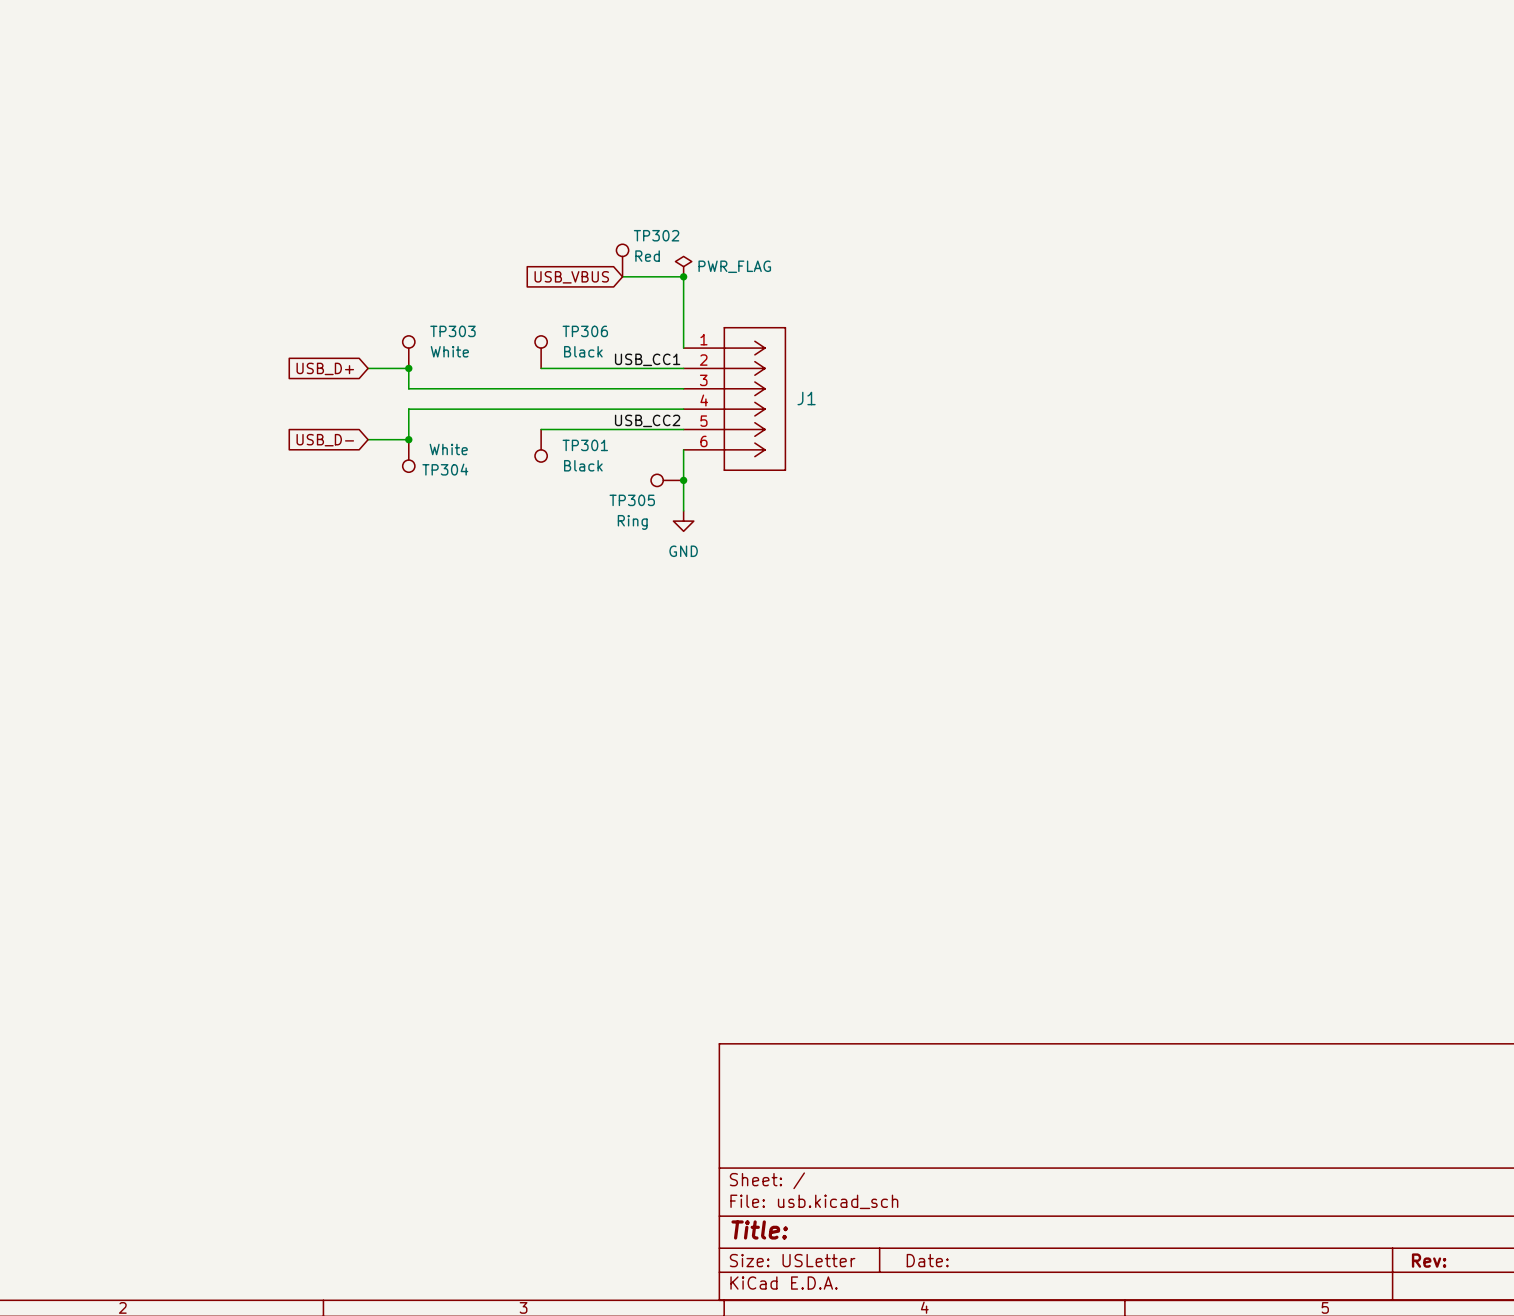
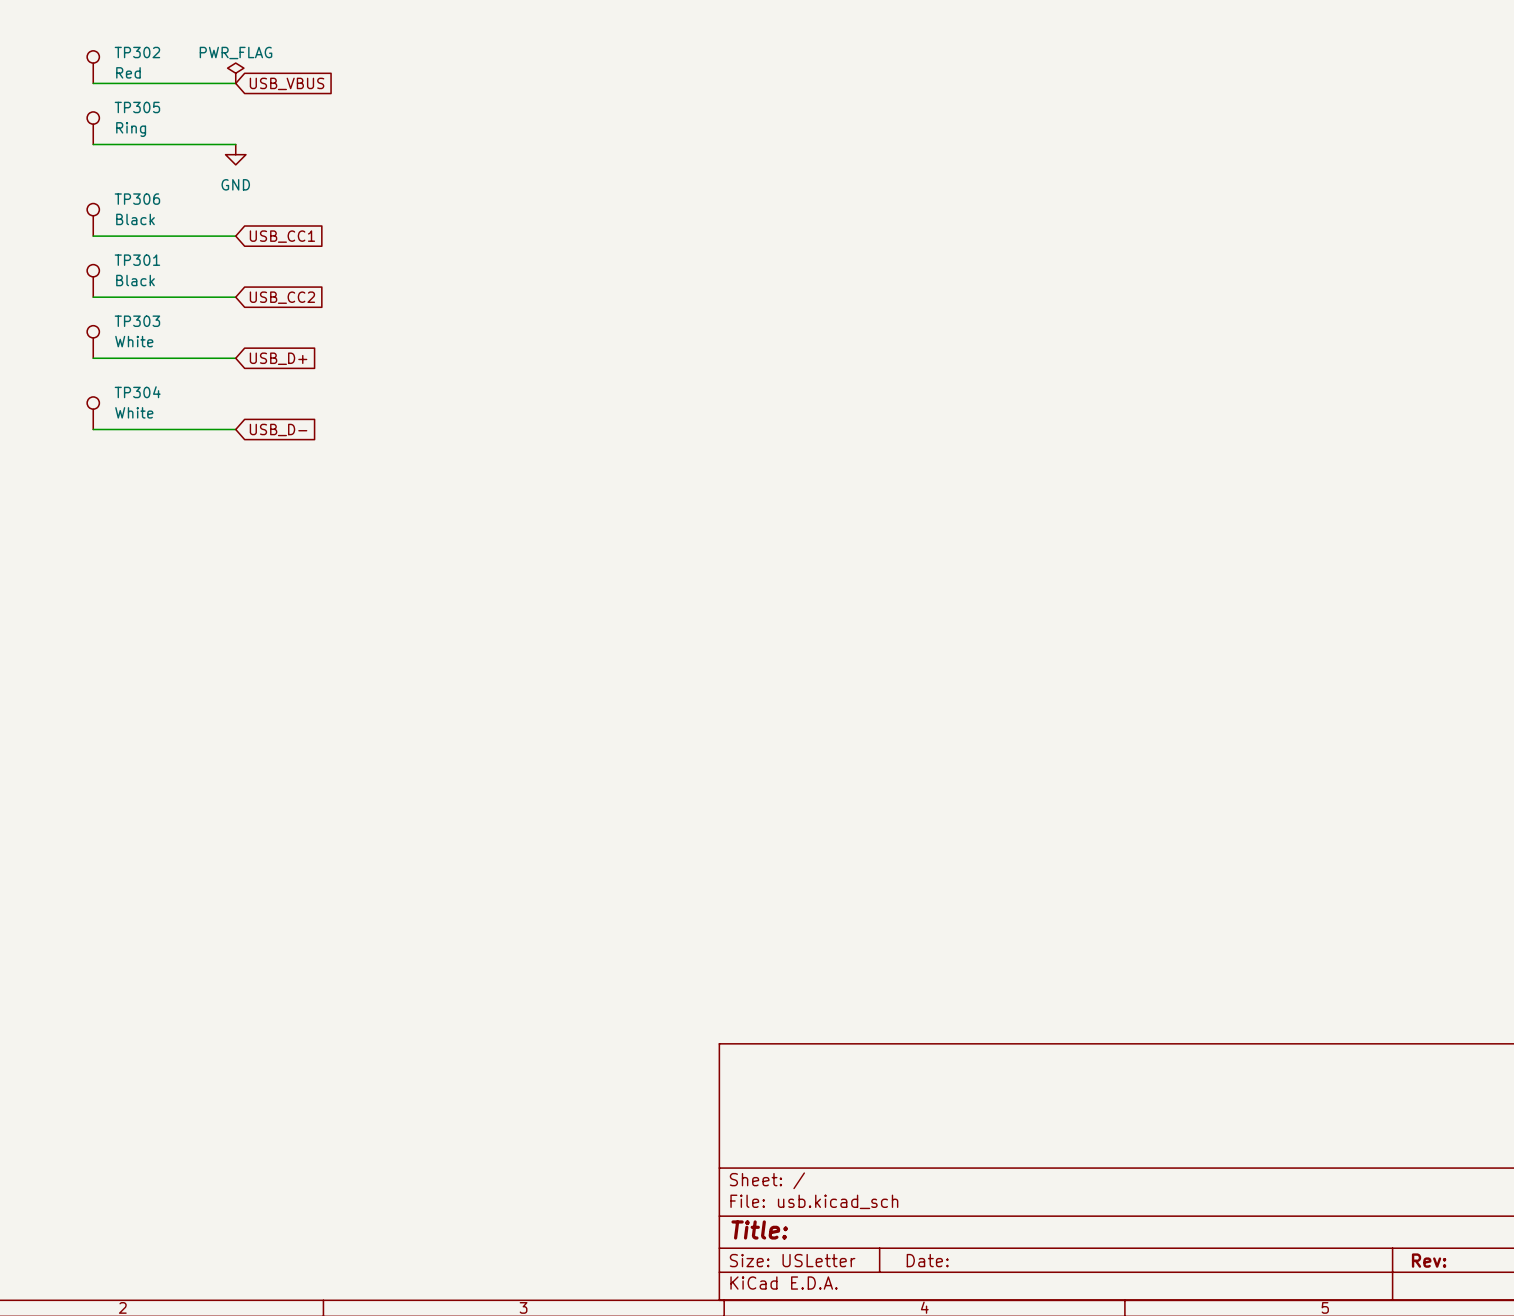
power symbol: none -> PWR_FLAG (235, 73)
wire: none -> (93, 83) (235, 83)
global label: none -> USB_VBUS (287, 83)
wire: none -> (93, 144) (235, 144)
power symbol: none -> GND (235, 154)
TP302 name position: TP302 (656, 235) -> TP302 (137, 52)
wire: none -> (93, 236) (235, 236)
global label: none -> USB_CC1 (282, 236)
TP302 value position: Red (647, 256) -> Red (128, 72)
TP302 position: (622, 260) -> (93, 67)
power symbol: PWR_FLAG (683, 266) -> none
wire: (622, 276) (683, 276) (683, 348) -> none
junction: (683, 276) -> none
global label: USB_VBUS (571, 277) -> none
wire: none -> (93, 297) (235, 297)
global label: none -> USB_CC2 (282, 297)
TP303 position: (408, 352) -> (93, 341)
TP306 position: (541, 352) -> (93, 219)
wire: none -> (93, 358) (235, 358)
label: USB_CC1 (647, 359) -> none
global label rotation: 0° (325, 368) -> 180° (278, 358)
wire: (368, 368) (408, 368) (408, 388) (683, 388) -> none
junction: (408, 368) -> none
wire: (541, 368) (683, 368) -> none
J1: (734, 398) -> none
wire: (683, 409) (408, 409) (408, 439) (368, 439) -> none
label: USB_CC2 (647, 420) -> none
wire: none -> (93, 429) (235, 429)
wire: (541, 429) (683, 429) -> none
junction: (408, 439) -> none
global label rotation: 0° (325, 440) -> 180° (278, 429)
TP301 position: (541, 445) -> (93, 280)
TP301 name position: TP301 (585, 445) -> TP301 (137, 260)
TP304 value position: White (448, 449) -> White (134, 412)
wire: (683, 449) (683, 510) -> none
TP304 position: (408, 455) -> (93, 413)
TP301 rotation: 0° (541, 455) -> 180° (93, 270)
TP301 value position: Black (583, 465) -> Black (135, 280)
TP304 rotation: 0° (408, 466) -> 180° (93, 403)
TP304 name position: TP304 (445, 469) -> TP304 (137, 392)
TP305 rotation: 0° (657, 480) -> 90° clockwise (93, 118)
TP305 position: (667, 480) -> (93, 128)
junction: (683, 480) -> none
TP305 name position: TP305 (632, 500) -> TP305 (137, 107)
power symbol: GND (683, 521) -> none
TP305 value position: Ring (632, 522) -> Ring (131, 129)

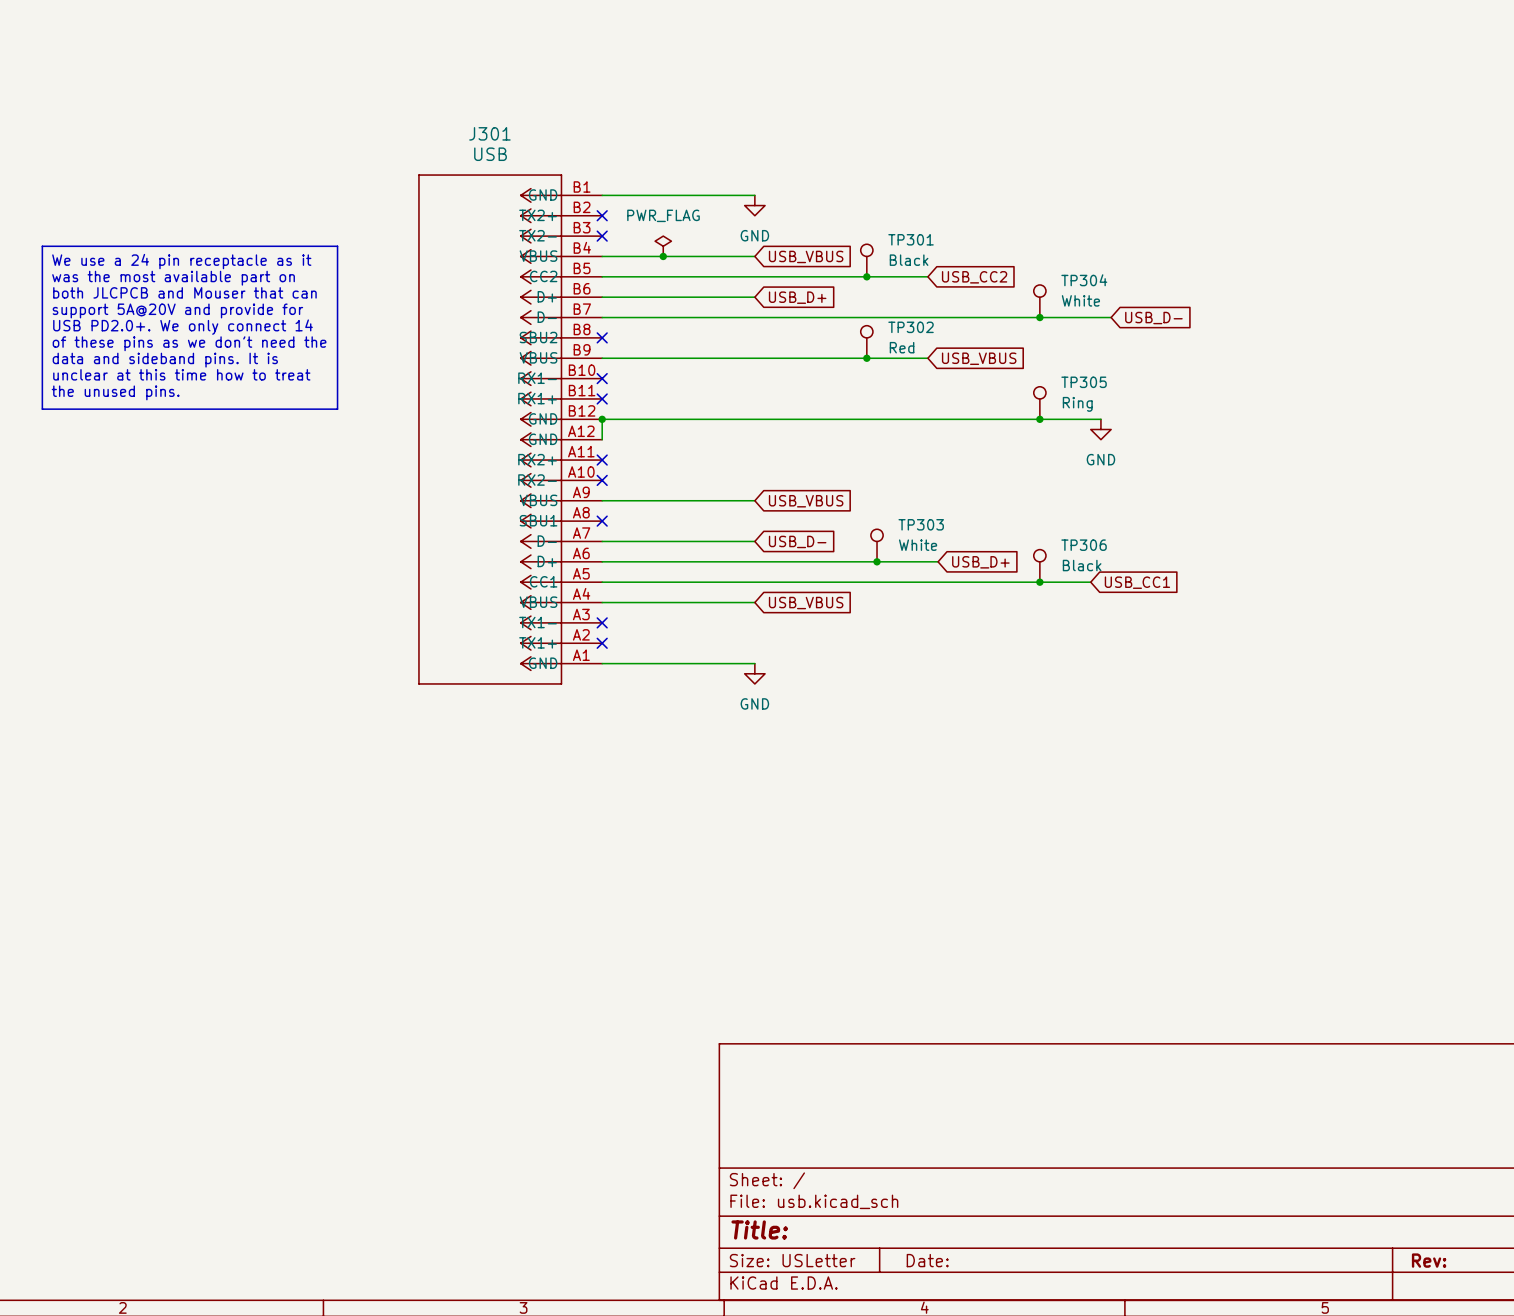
TP302 position: (93, 67) -> (866, 341)
power symbol: PWR_FLAG (235, 73) -> none
wire: (93, 83) (235, 83) -> none
global label: USB_VBUS (287, 83) -> none
TP305 position: (93, 128) -> (1039, 403)
wire: (93, 144) (235, 144) -> none
power symbol: GND (235, 154) -> none
wire: none -> (602, 195) (754, 195)
power symbol: none -> GND (754, 205)
no-connect mark: none -> (602, 215)
TP306 position: (93, 219) -> (1039, 565)
wire: (93, 236) (235, 236) -> none
global label: USB_CC1 (282, 236) -> none
no-connect mark: none -> (602, 236)
line: none -> (42, 246) (337, 246) (337, 409) (42, 409) (42, 246)
power symbol: none -> PWR_FLAG (663, 246)
wire: none -> (602, 256) (754, 256)
junction: none -> (663, 256)
global label: none -> USB_VBUS (806, 256)
text: none -> We use a 24 pin receptacle as it (181, 261)
wire: none -> (602, 276) (927, 276)
junction: none -> (866, 276)
global label: none -> USB_CC2 (974, 277)
text: none -> was the most available part on (173, 278)
TP301 position: (93, 280) -> (866, 260)
text: none -> both JLCPCB and Mouser that can (184, 292)
wire: (93, 297) (235, 297) -> none
global label: USB_CC2 (282, 297) -> none
wire: none -> (602, 297) (754, 297)
global label: none -> USB_D+ (797, 297)
text: none -> support 5A@20V and provide for (177, 310)
wire: none -> (602, 317) (1111, 317)
junction: none -> (1039, 317)
global label: none -> USB_D- (1153, 318)
text: none -> USB PD2.0+. We only connect 14 (183, 327)
no-connect mark: none -> (602, 337)
TP303 position: (93, 341) -> (877, 545)
text: none -> of these pins as we don't need the (189, 343)
wire: (93, 358) (235, 358) -> none
global label: USB_D+ (278, 358) -> none
wire: none -> (602, 358) (927, 358)
junction: none -> (866, 358)
global label: none -> USB_VBUS (979, 358)
text: none -> data and sideband pins. It is (165, 360)
text: none -> unclear at this time how to treat (181, 374)
no-connect mark: none -> (602, 378)
text: none -> the unused pins. (115, 392)
no-connect mark: none -> (602, 398)
TP304 position: (93, 413) -> (1039, 301)
junction: none -> (602, 419)
junction: none -> (1039, 419)
wire: none -> (1100, 419) (602, 419) (602, 439)
wire: (93, 429) (235, 429) -> none
global label: USB_D- (278, 429) -> none
J301: none -> USB (510, 429)
power symbol: none -> GND (1100, 429)
no-connect mark: none -> (602, 460)
no-connect mark: none -> (602, 480)
wire: none -> (602, 500) (754, 500)
global label: none -> USB_VBUS (806, 501)
no-connect mark: none -> (602, 521)
wire: none -> (602, 541) (754, 541)
global label: none -> USB_D- (797, 541)
wire: none -> (602, 561) (938, 561)
junction: none -> (877, 561)
global label: none -> USB_D+ (980, 562)
wire: none -> (602, 582) (1090, 582)
junction: none -> (1039, 582)
global label: none -> USB_CC1 (1137, 582)
wire: none -> (602, 602) (754, 602)
global label: none -> USB_VBUS (806, 603)
no-connect mark: none -> (602, 622)
no-connect mark: none -> (602, 643)
wire: none -> (602, 663) (754, 663)
power symbol: none -> GND (754, 673)

